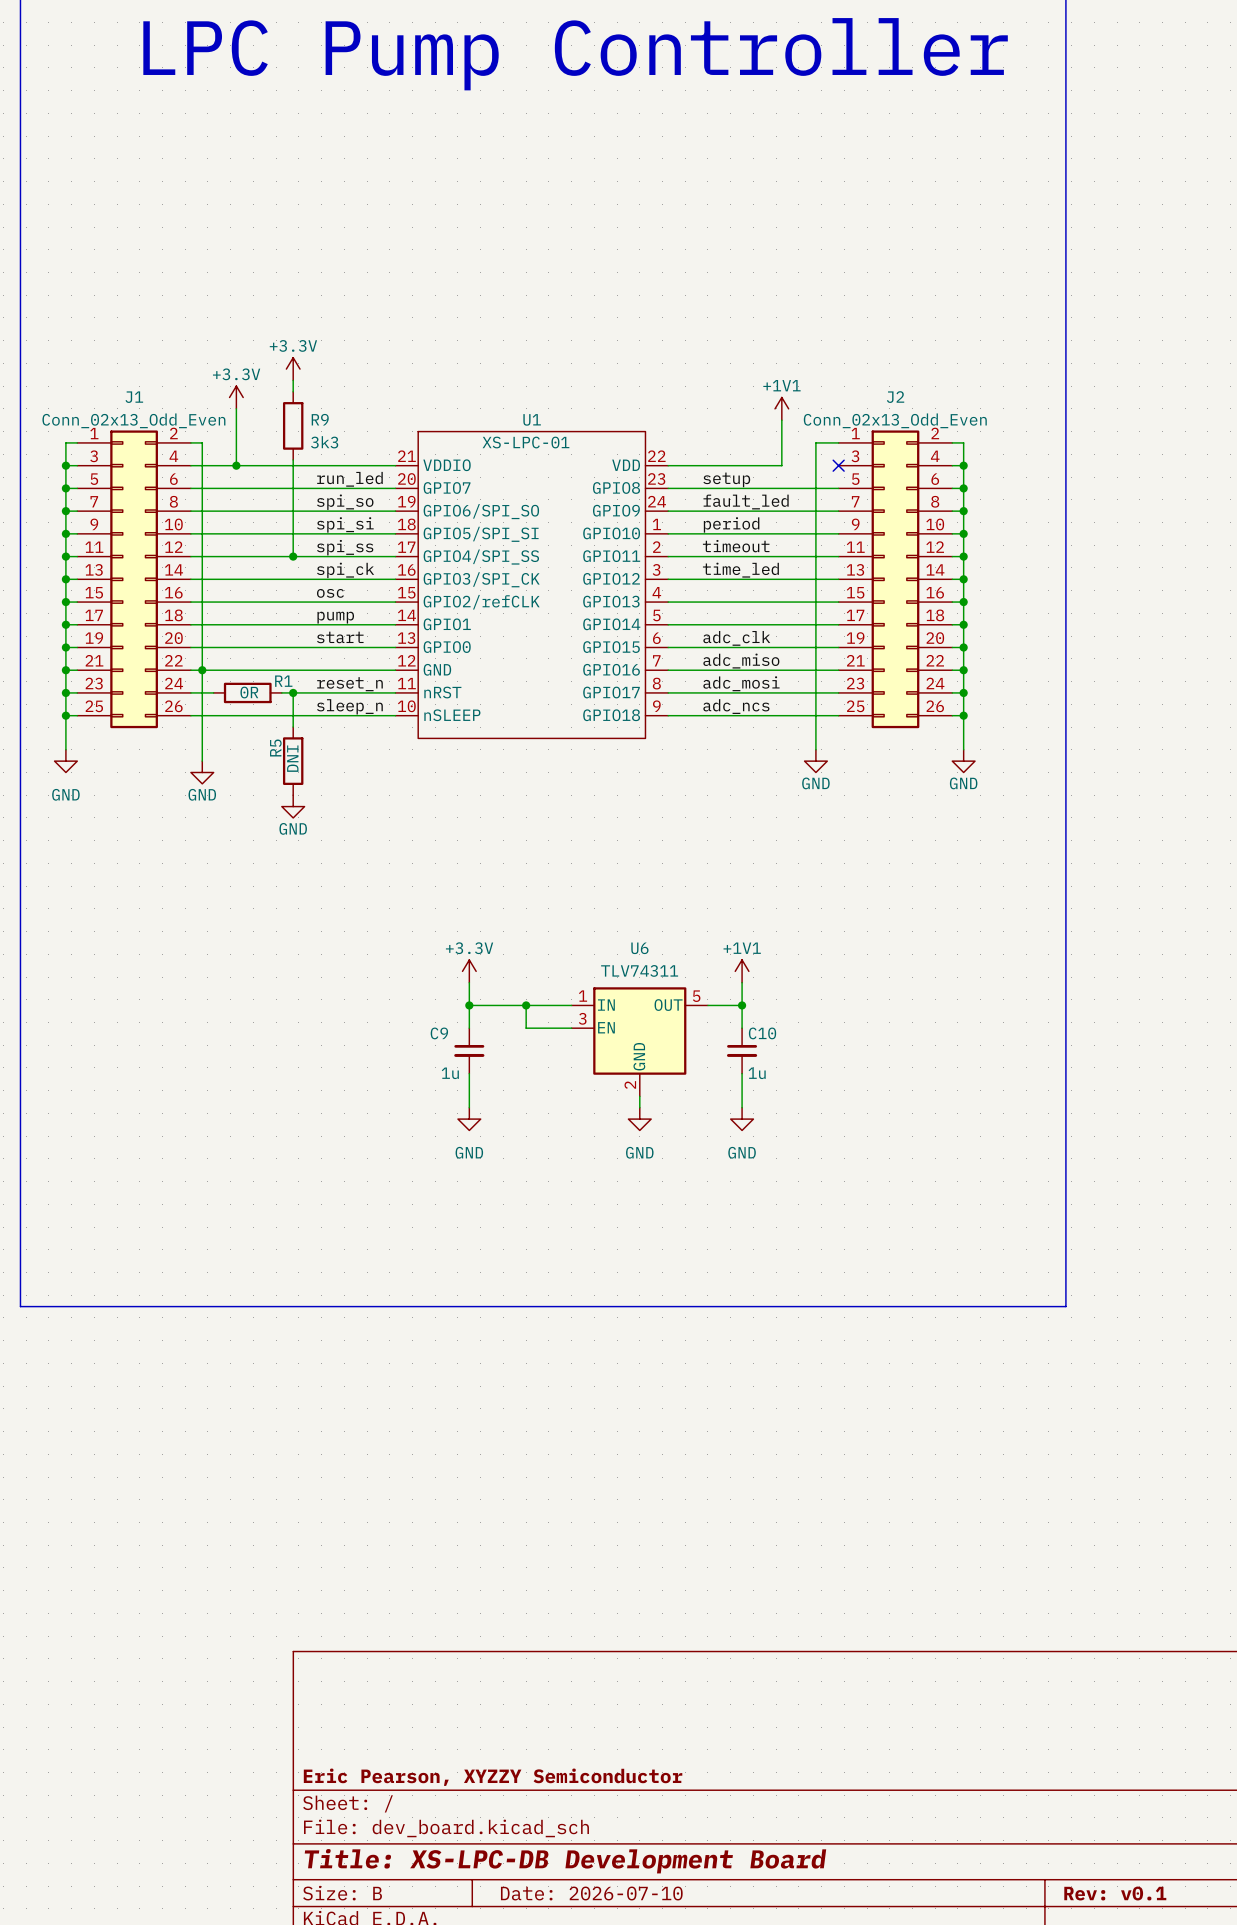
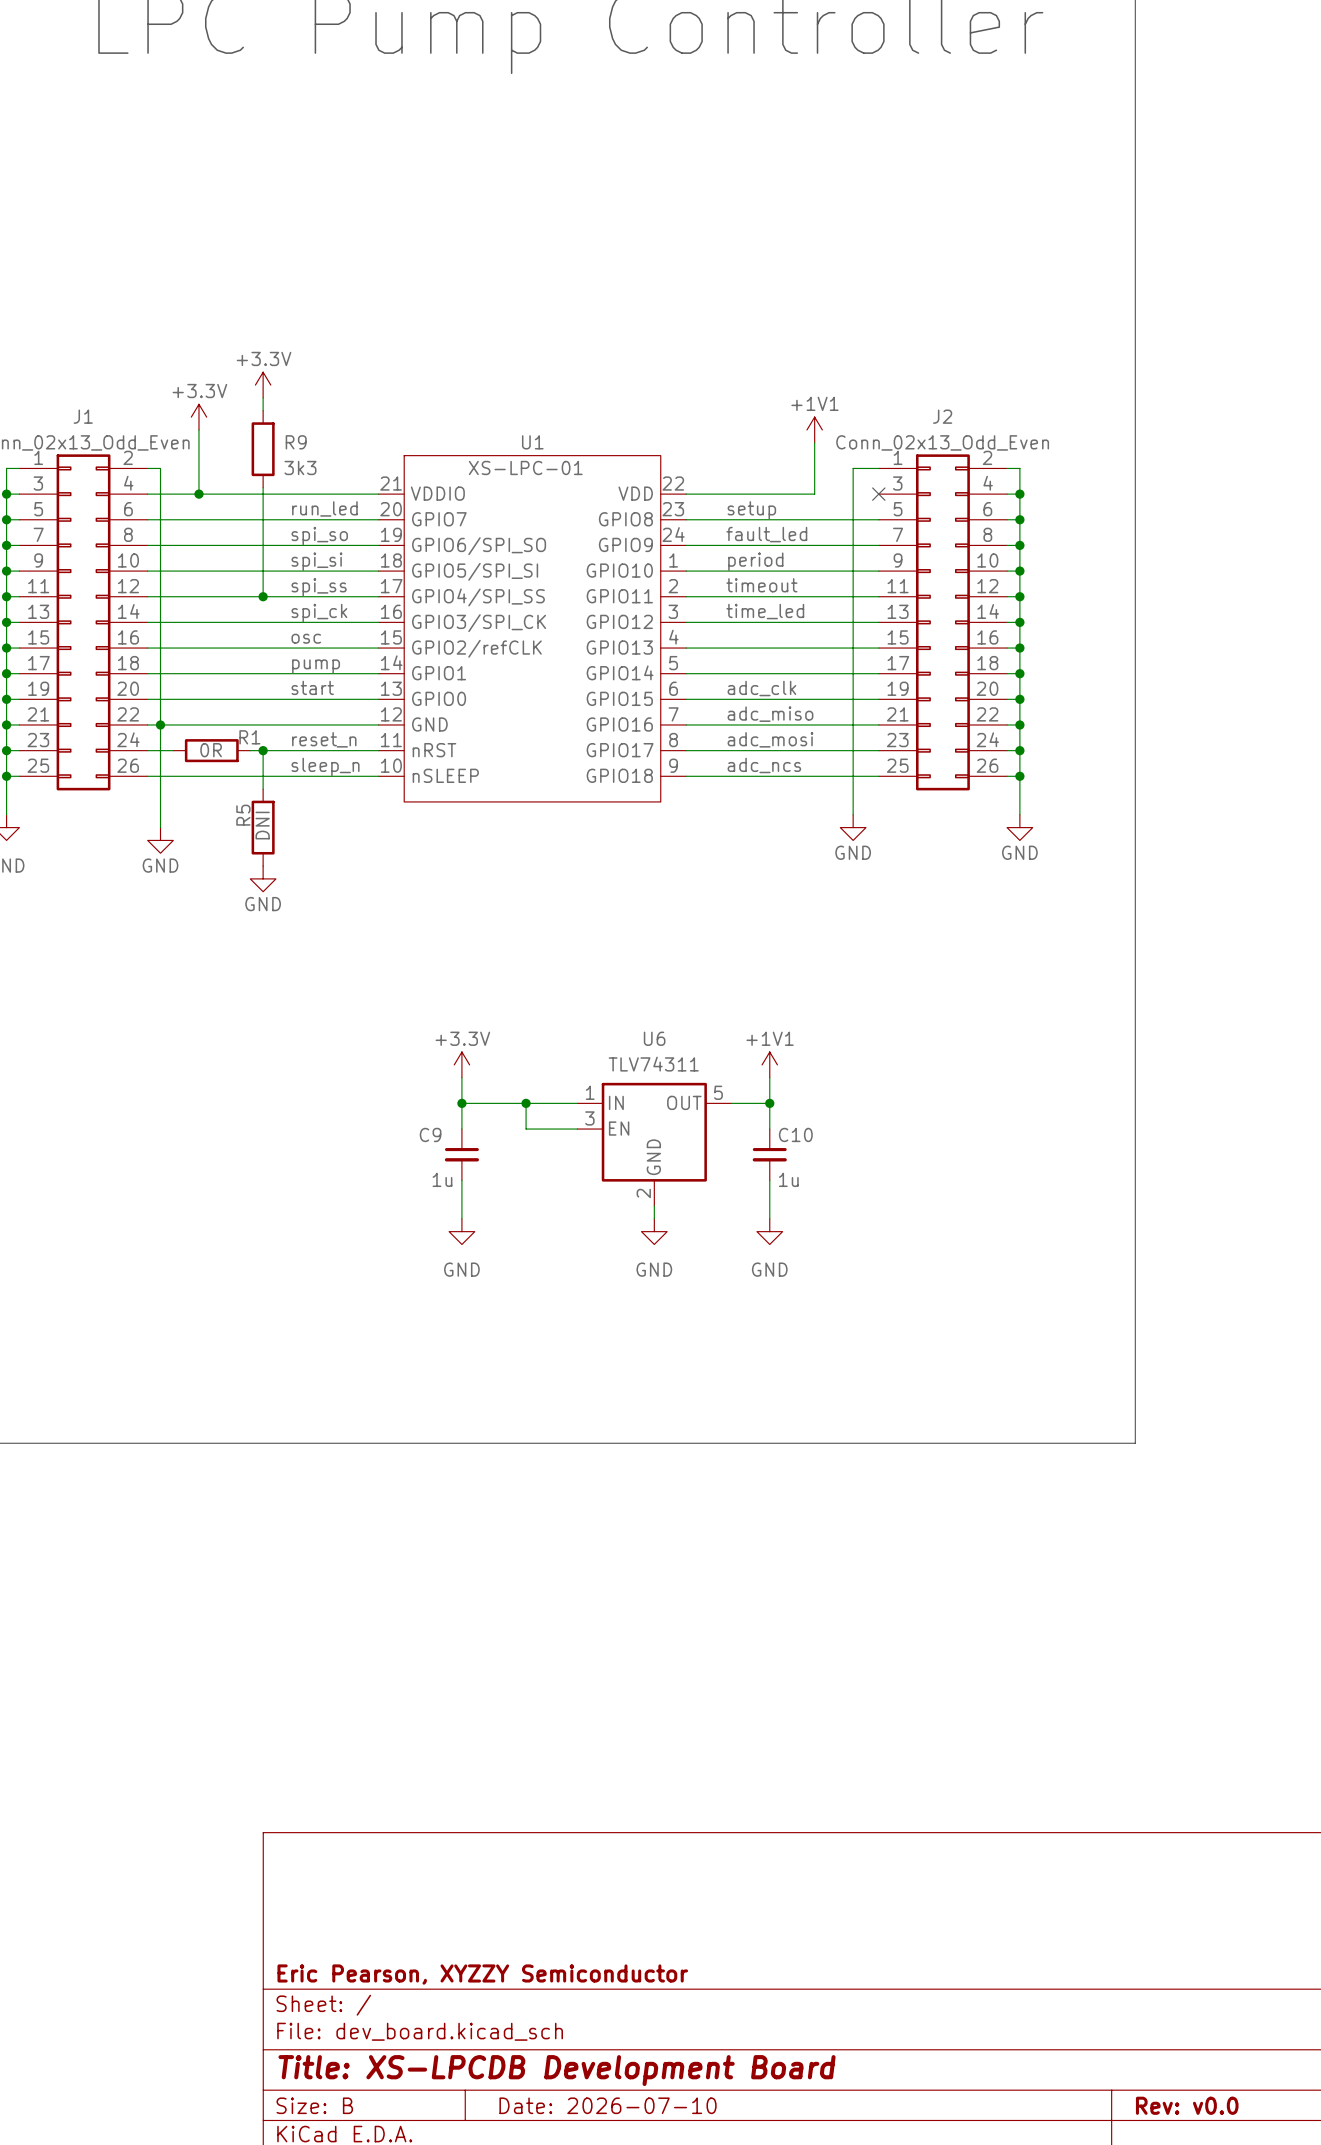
title block: Title: XS-LPC-DB Development Board (565, 1861) -> Title: XS-LPCDB Development Board (557, 2070)
title block: Rev: v0.1 (1115, 1893) -> Rev: v0.0 (1187, 2105)

